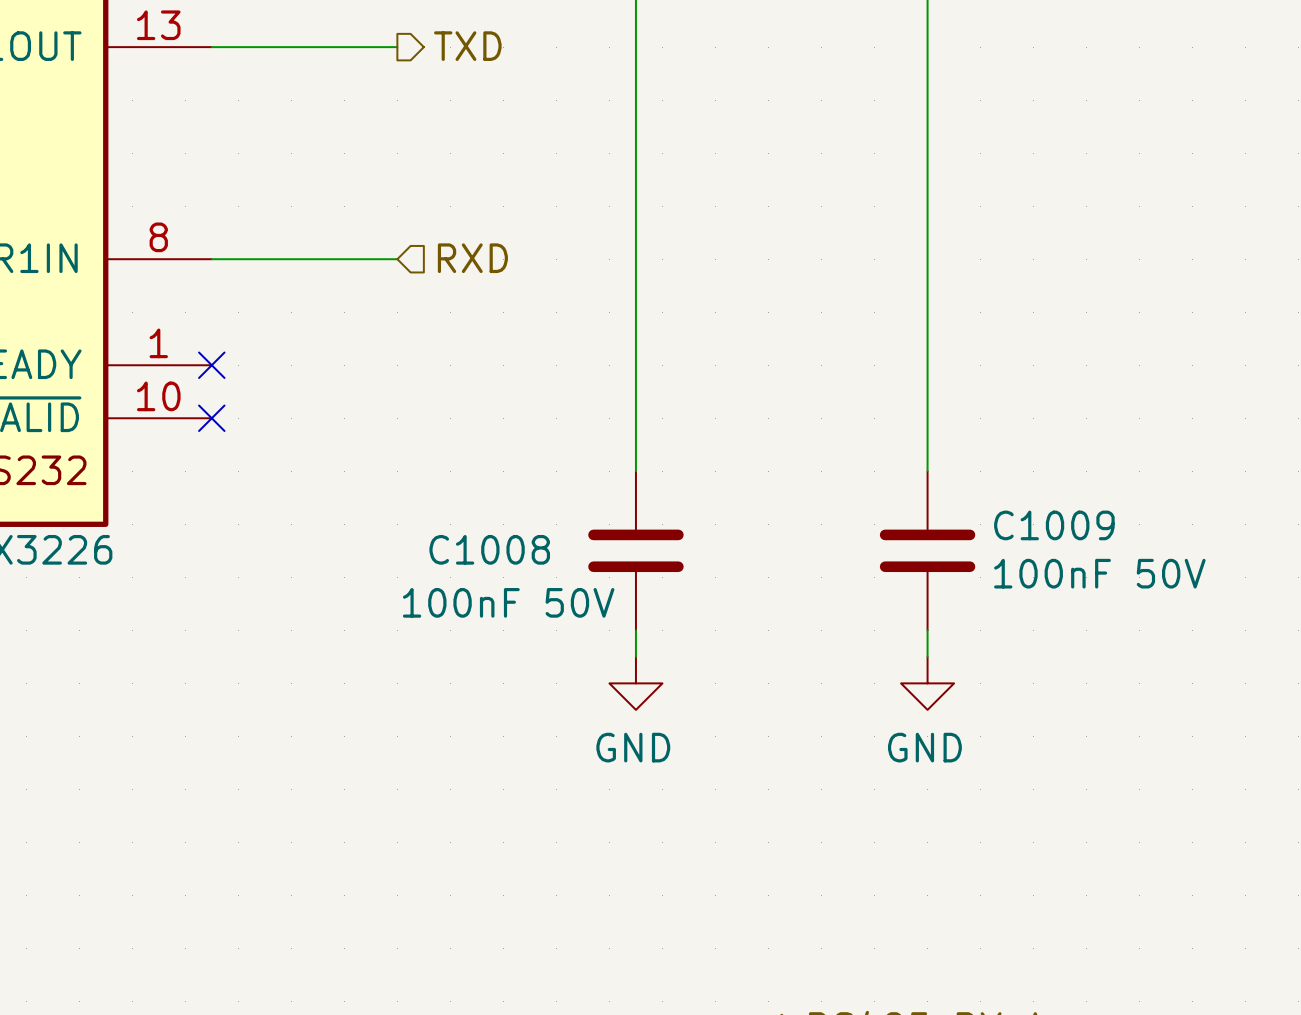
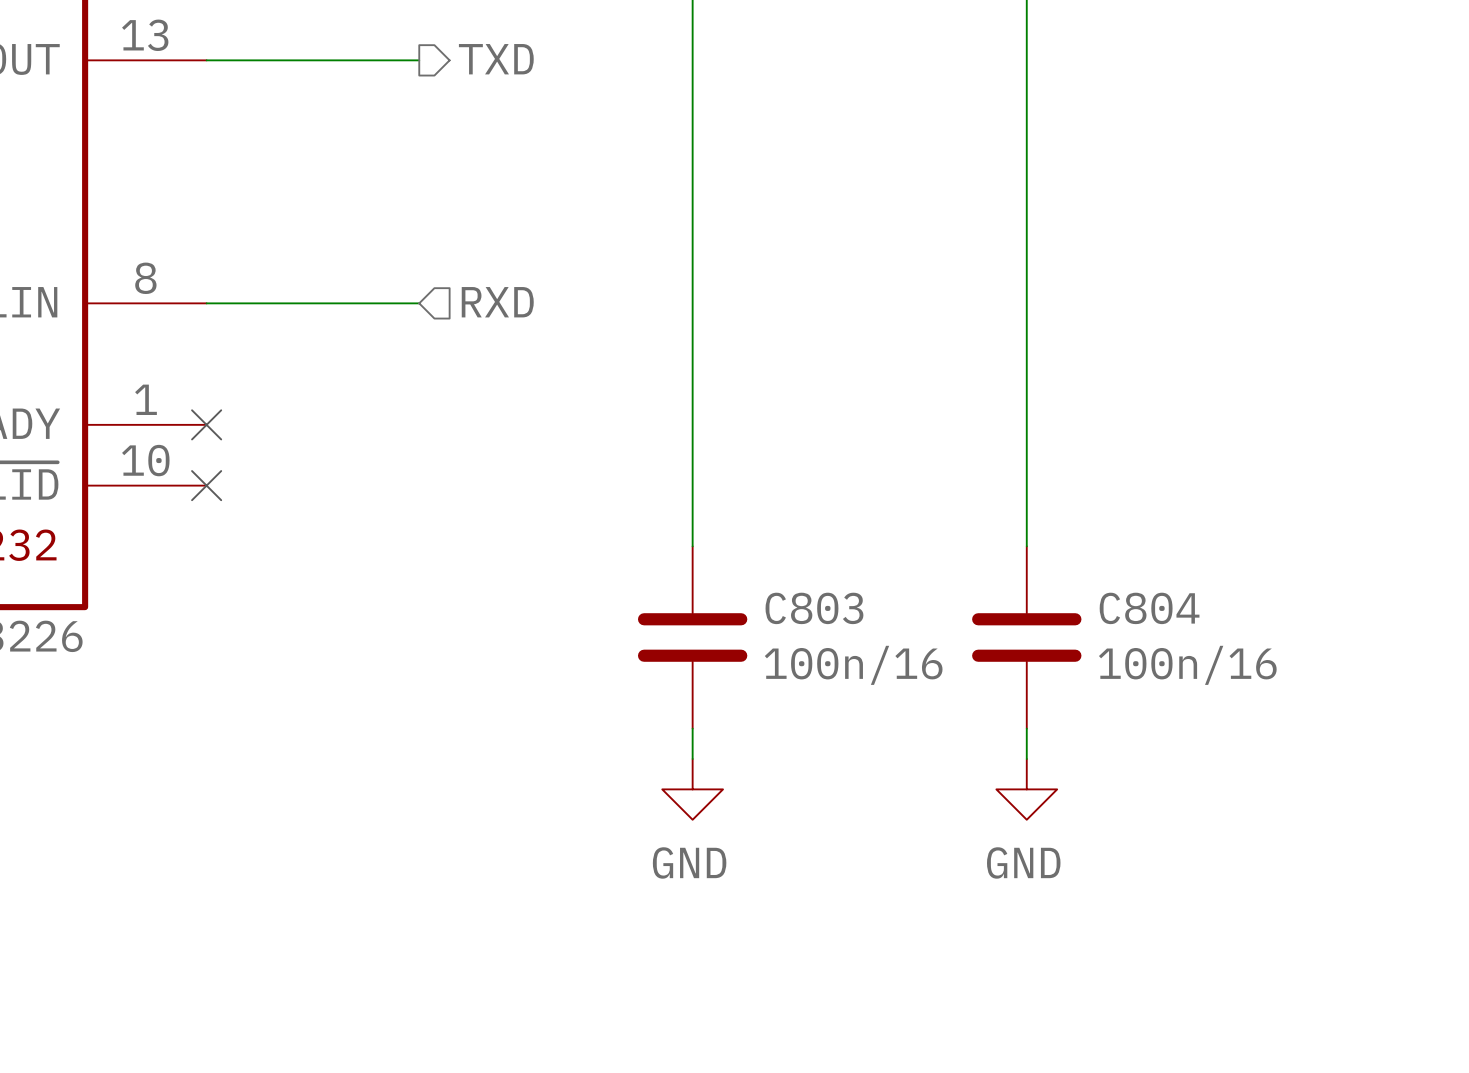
C1009 name: C1009 (1054, 525) -> C804 (1149, 608)
C1008 name: C1008 (489, 549) -> C803 (814, 608)
C1009 value: 100nF 50V (1099, 573) -> 100n/16 (1187, 665)
C1008 value: 100nF 50V (508, 602) -> 100n/16 (853, 665)

